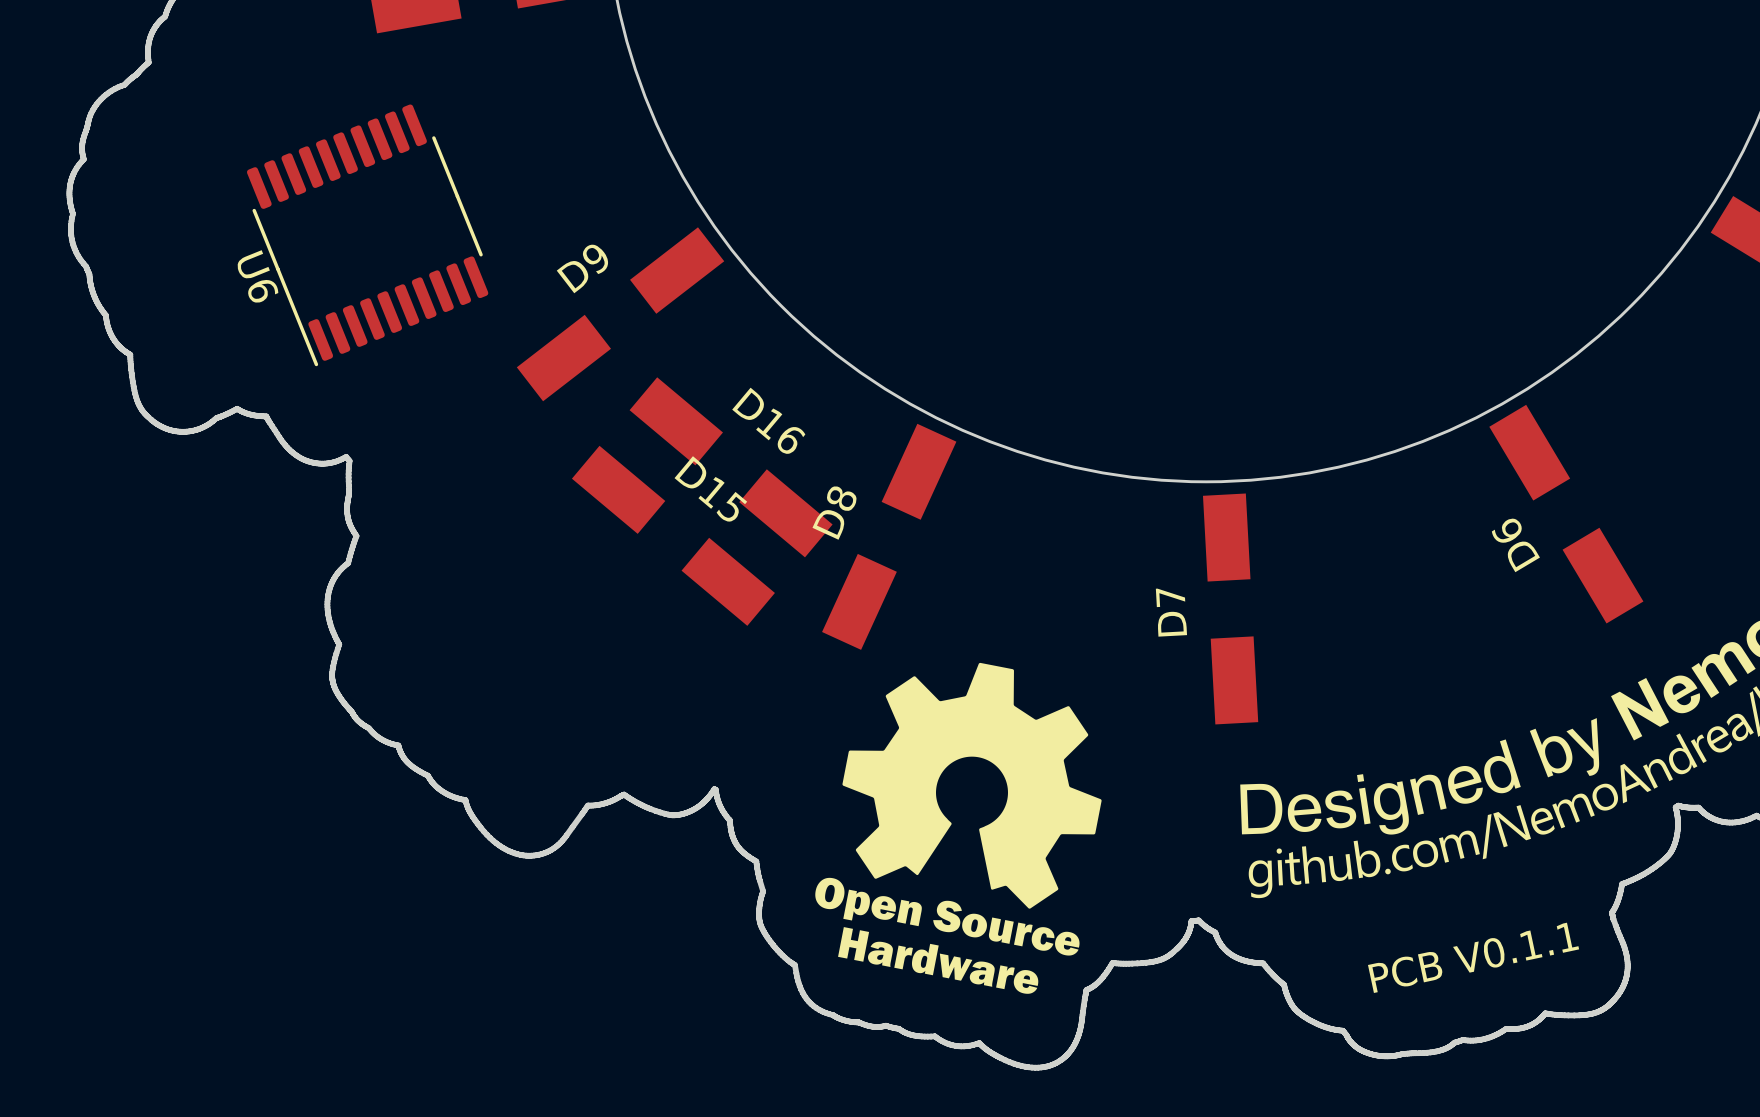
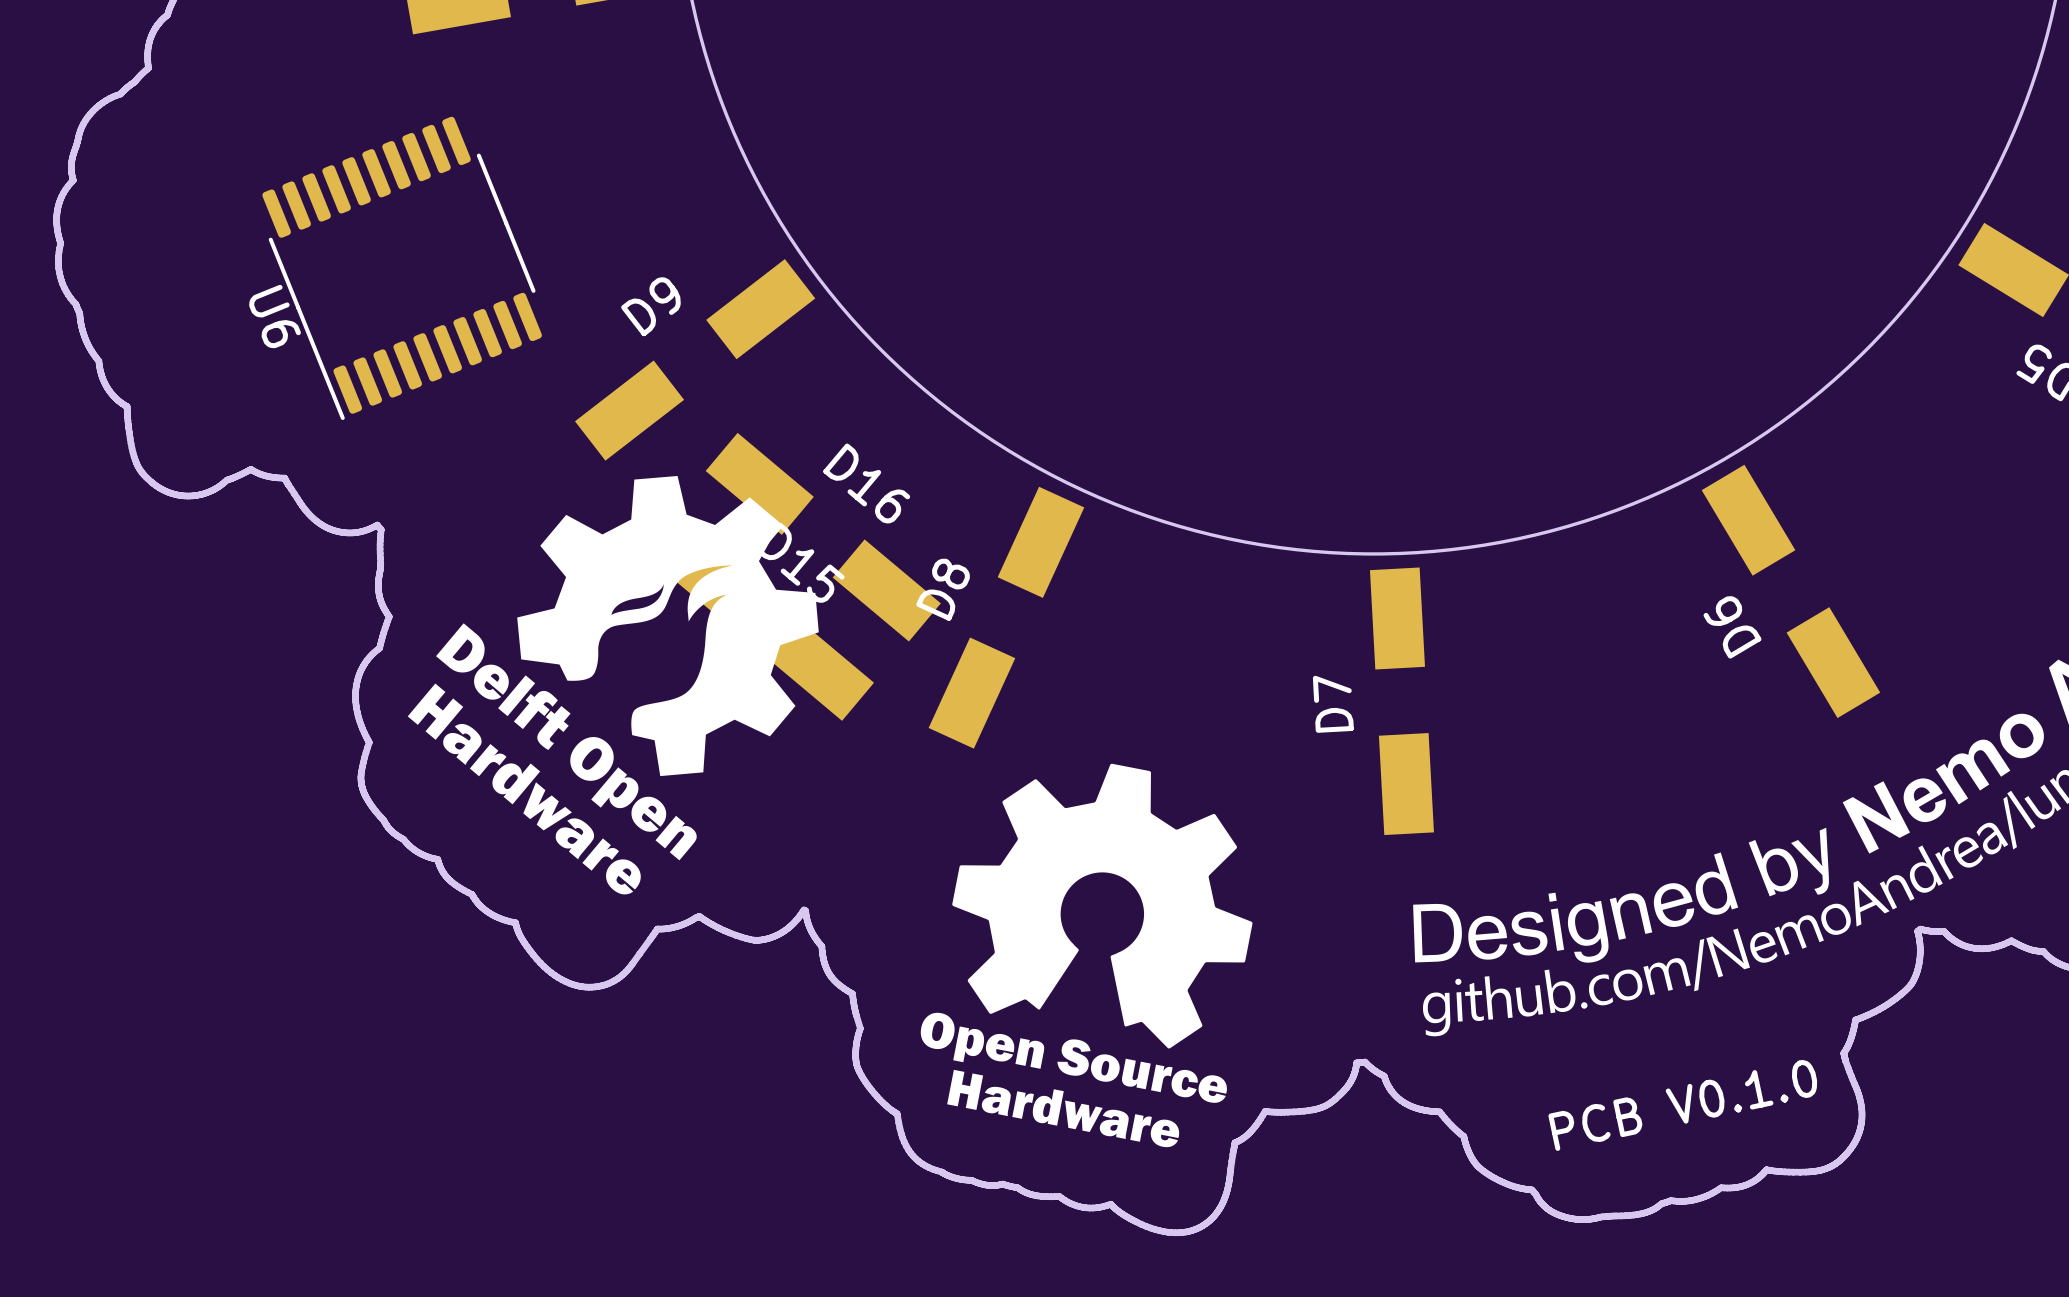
drawing: none -> [407, 475, 819, 895]
text: PCB V0.1.1 (1473, 957) -> PCB V0.1.0 (1682, 1105)

